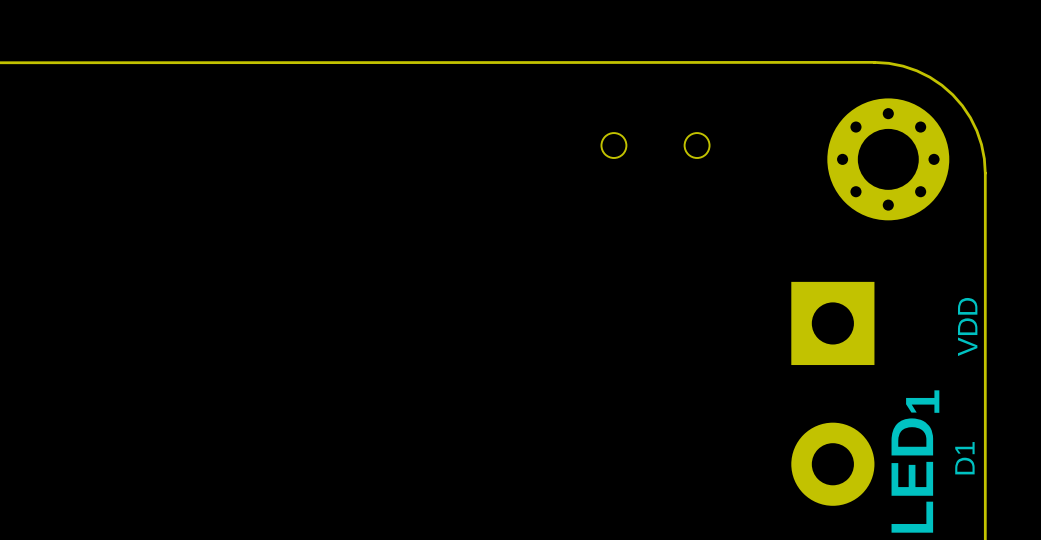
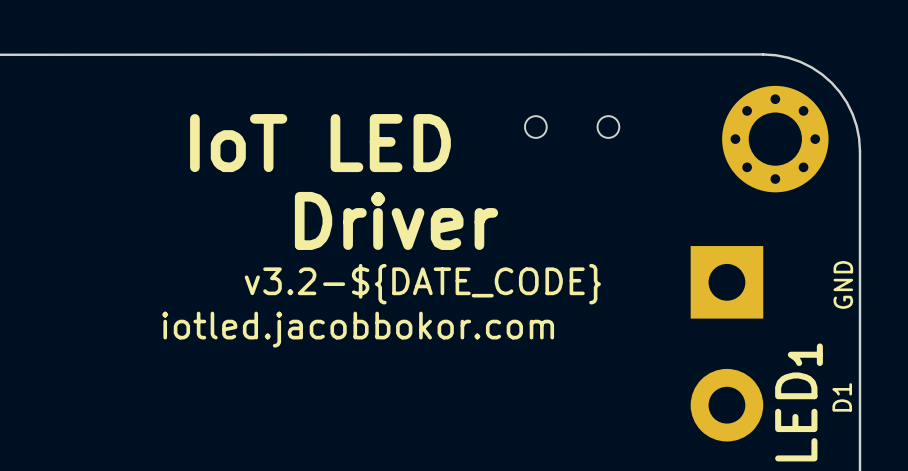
text: none -> IoT LED (320, 143)
text: none -> Driver (396, 220)
text: none -> v3.2-${DATE_CODE} (422, 284)
text: VDD (967, 326) -> GND (843, 284)
text: none -> iotled.jacobbokor.com (358, 329)

